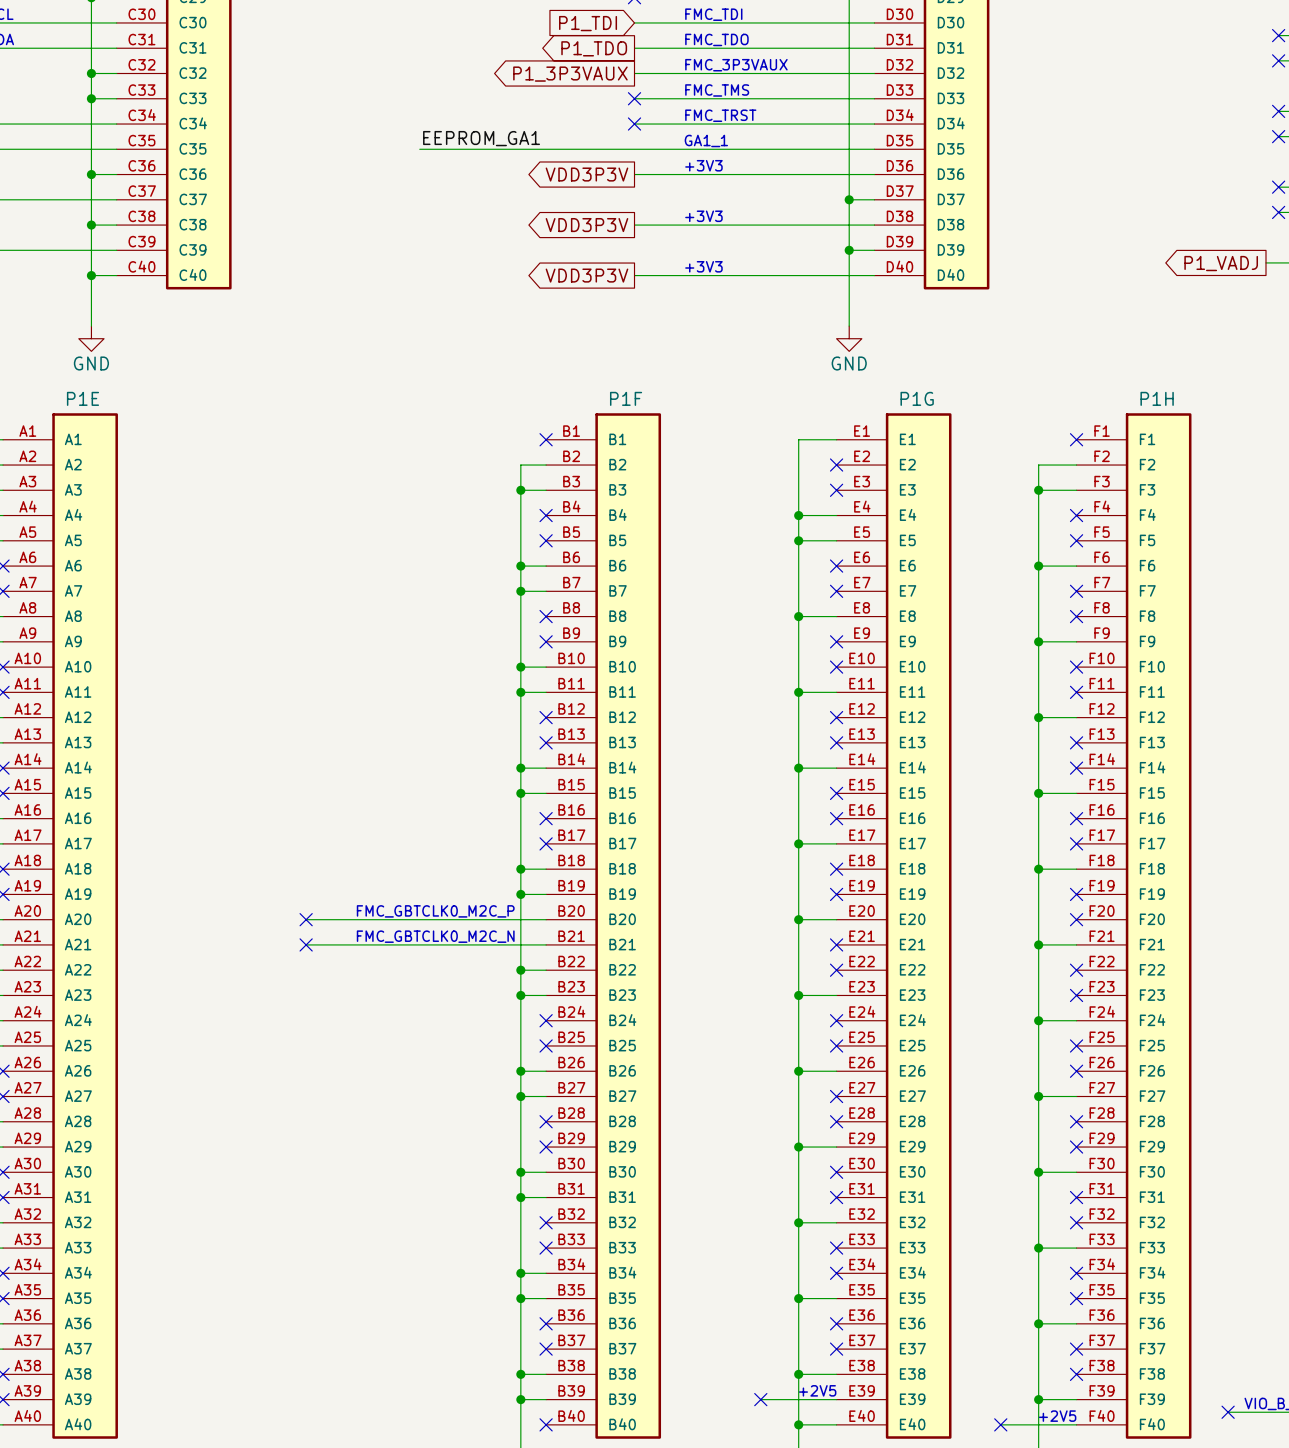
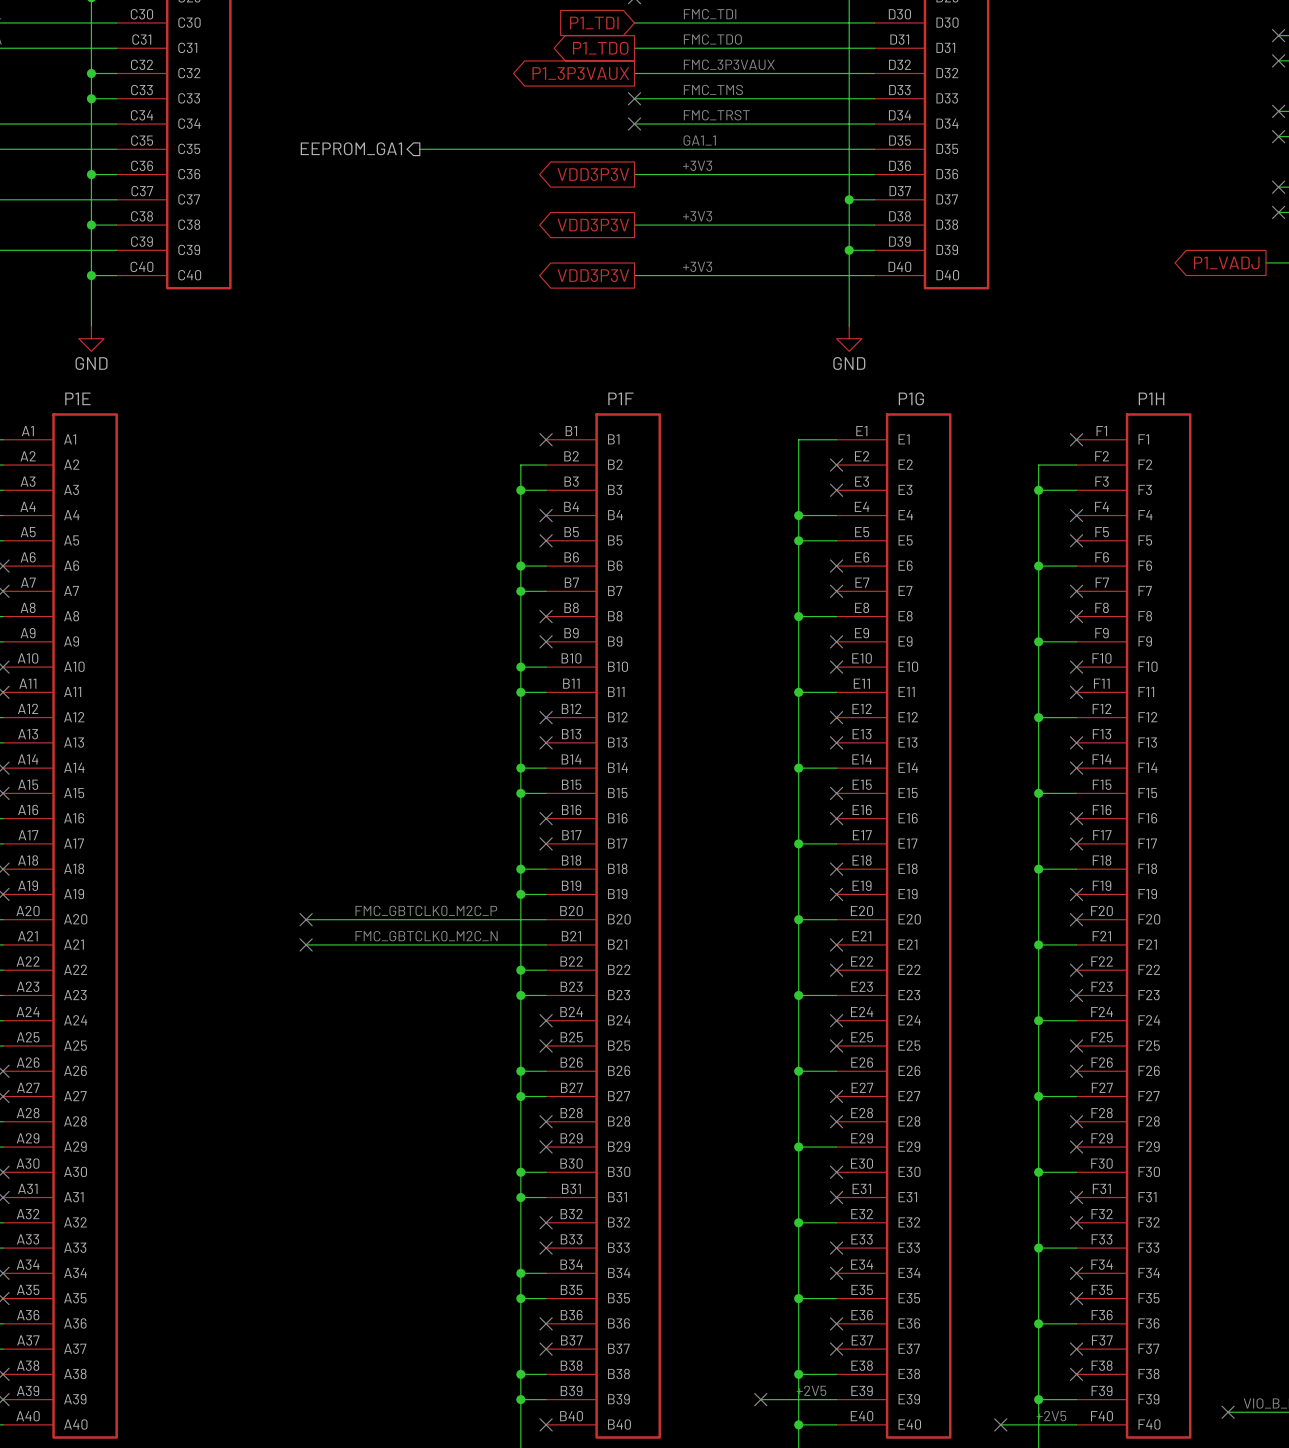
label: EEPROM_GA1 (481, 138) -> none
hierarchical label: none -> EEPROM_GA1 (351, 148)

